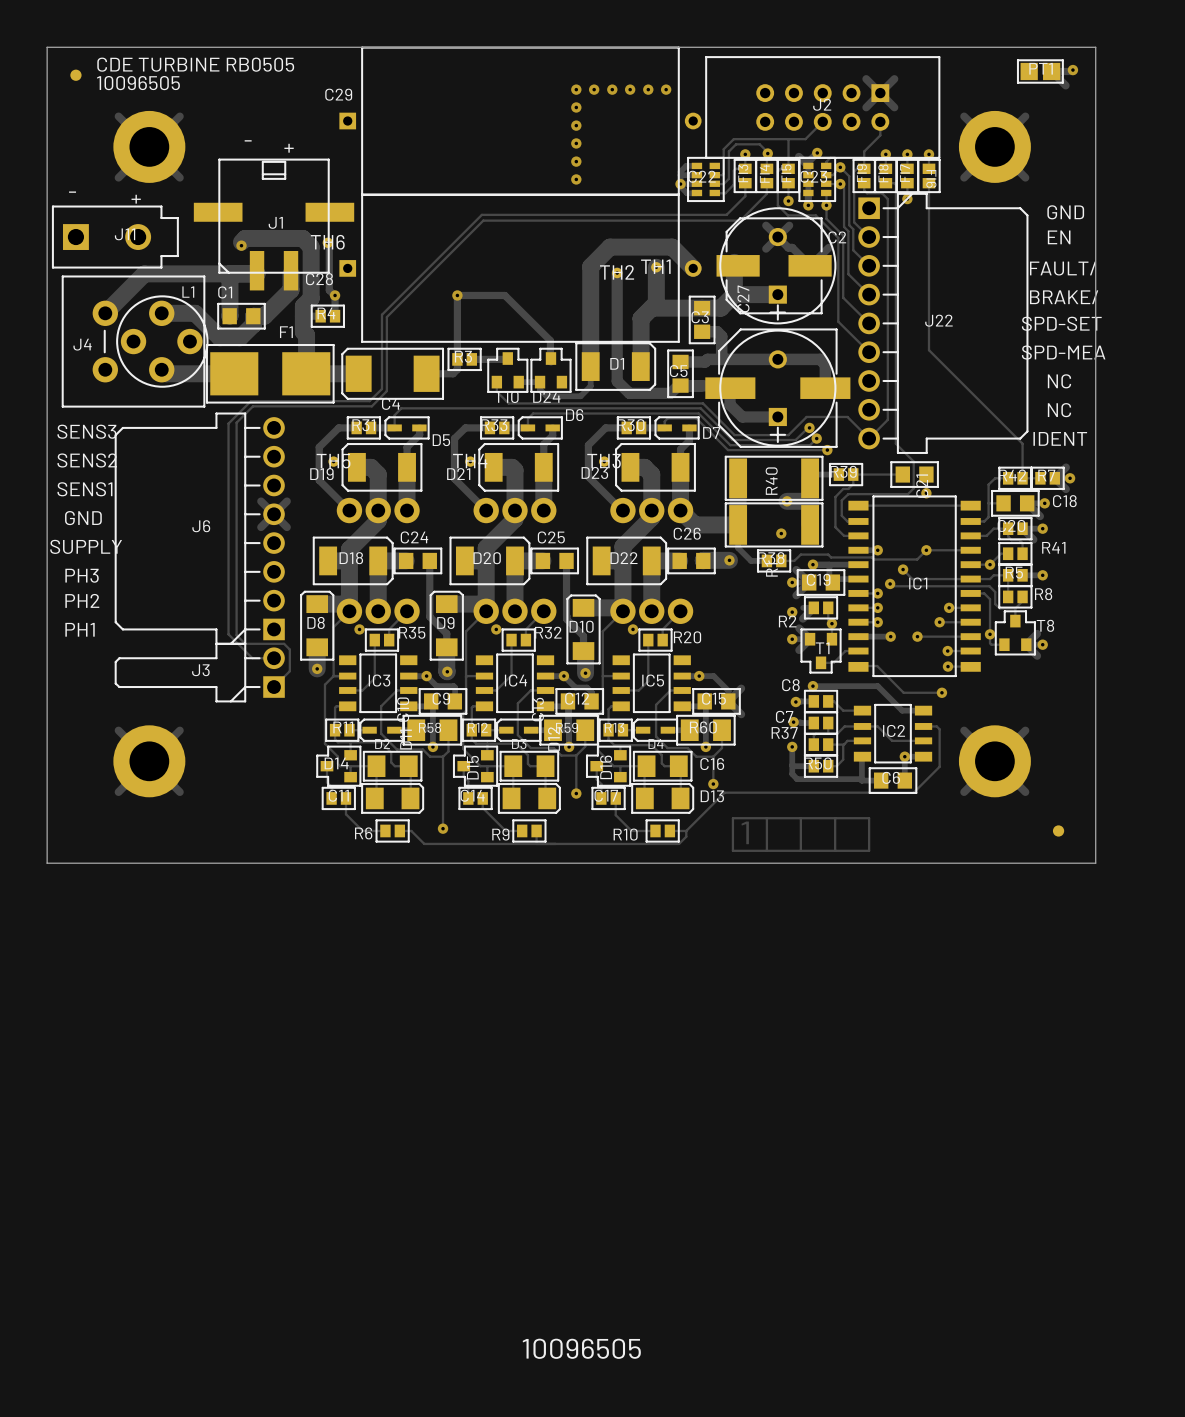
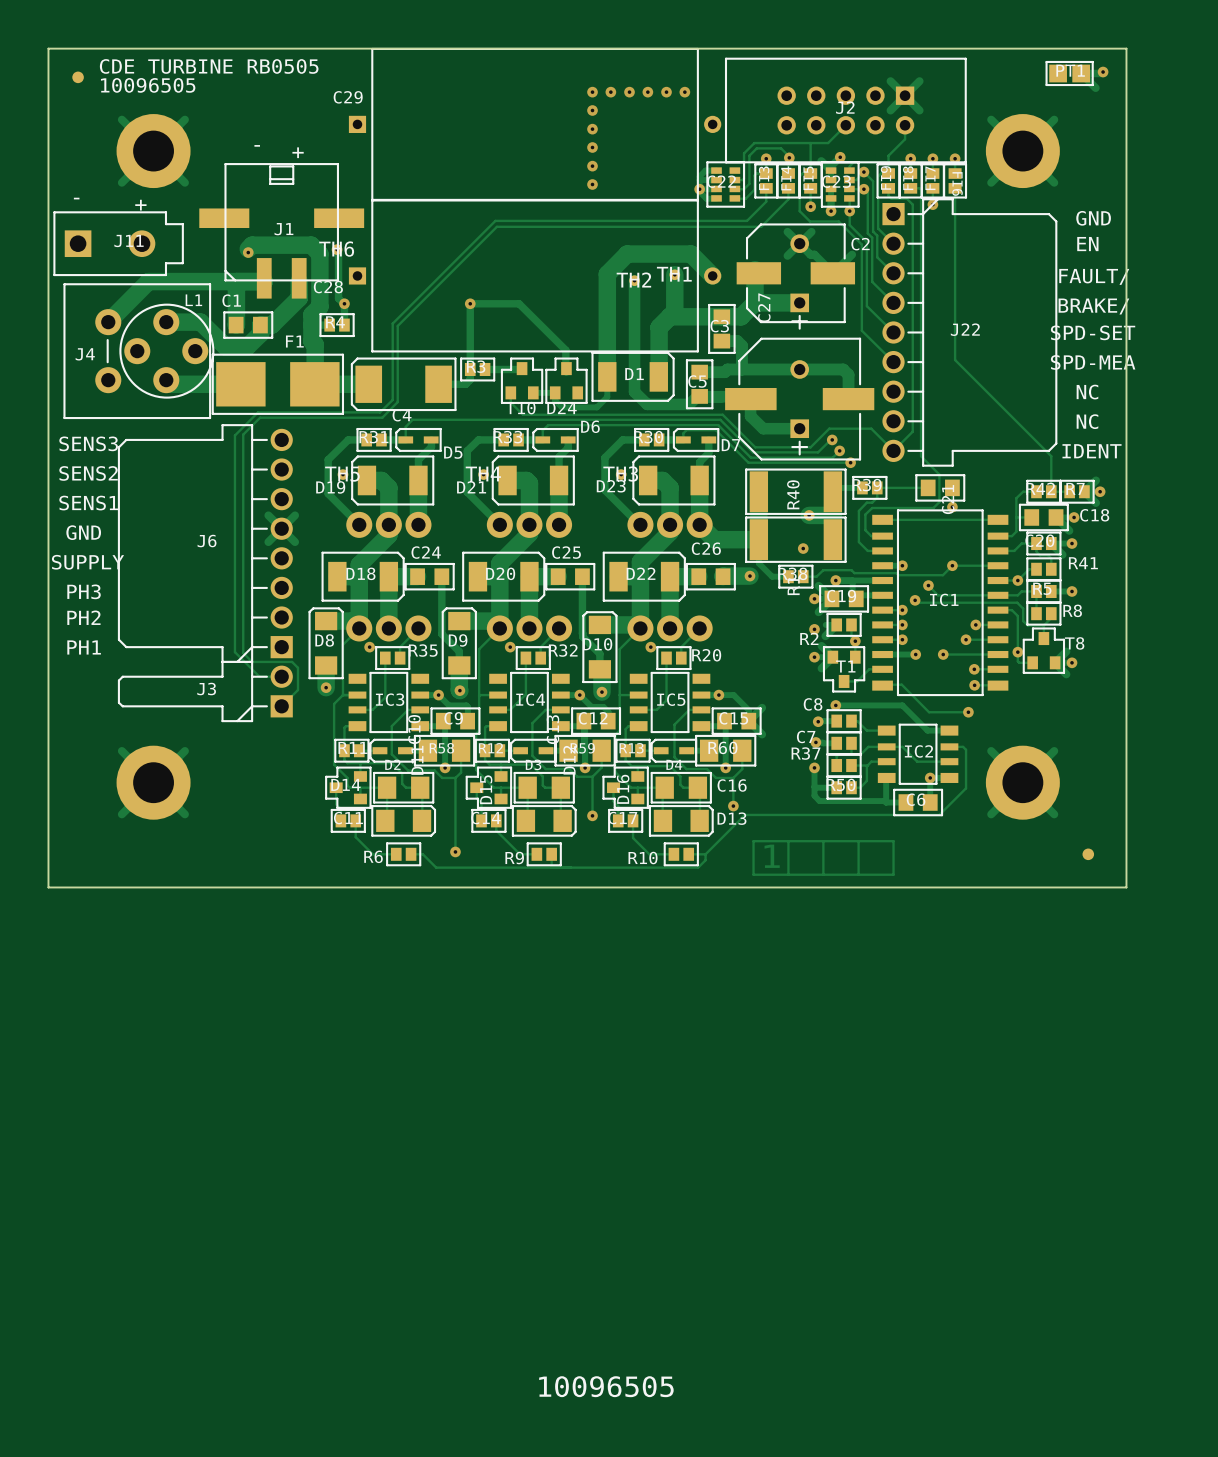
C2 footprint: [719, 207, 837, 325] -> [790, 234, 810, 330]
C27 footprint: [719, 329, 837, 447] -> [790, 360, 810, 456]

